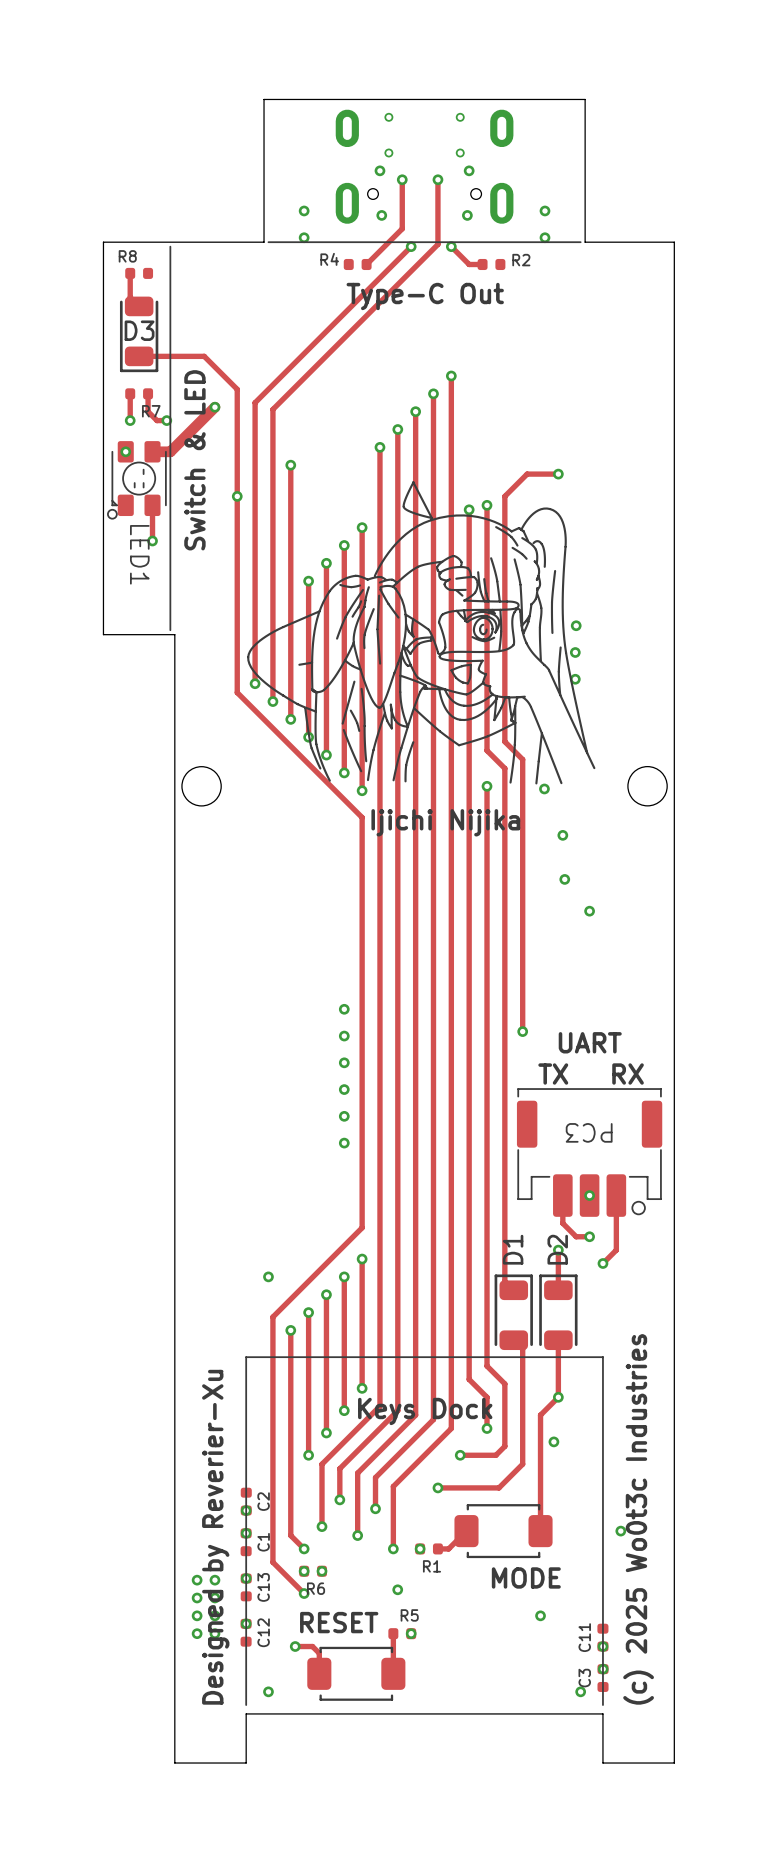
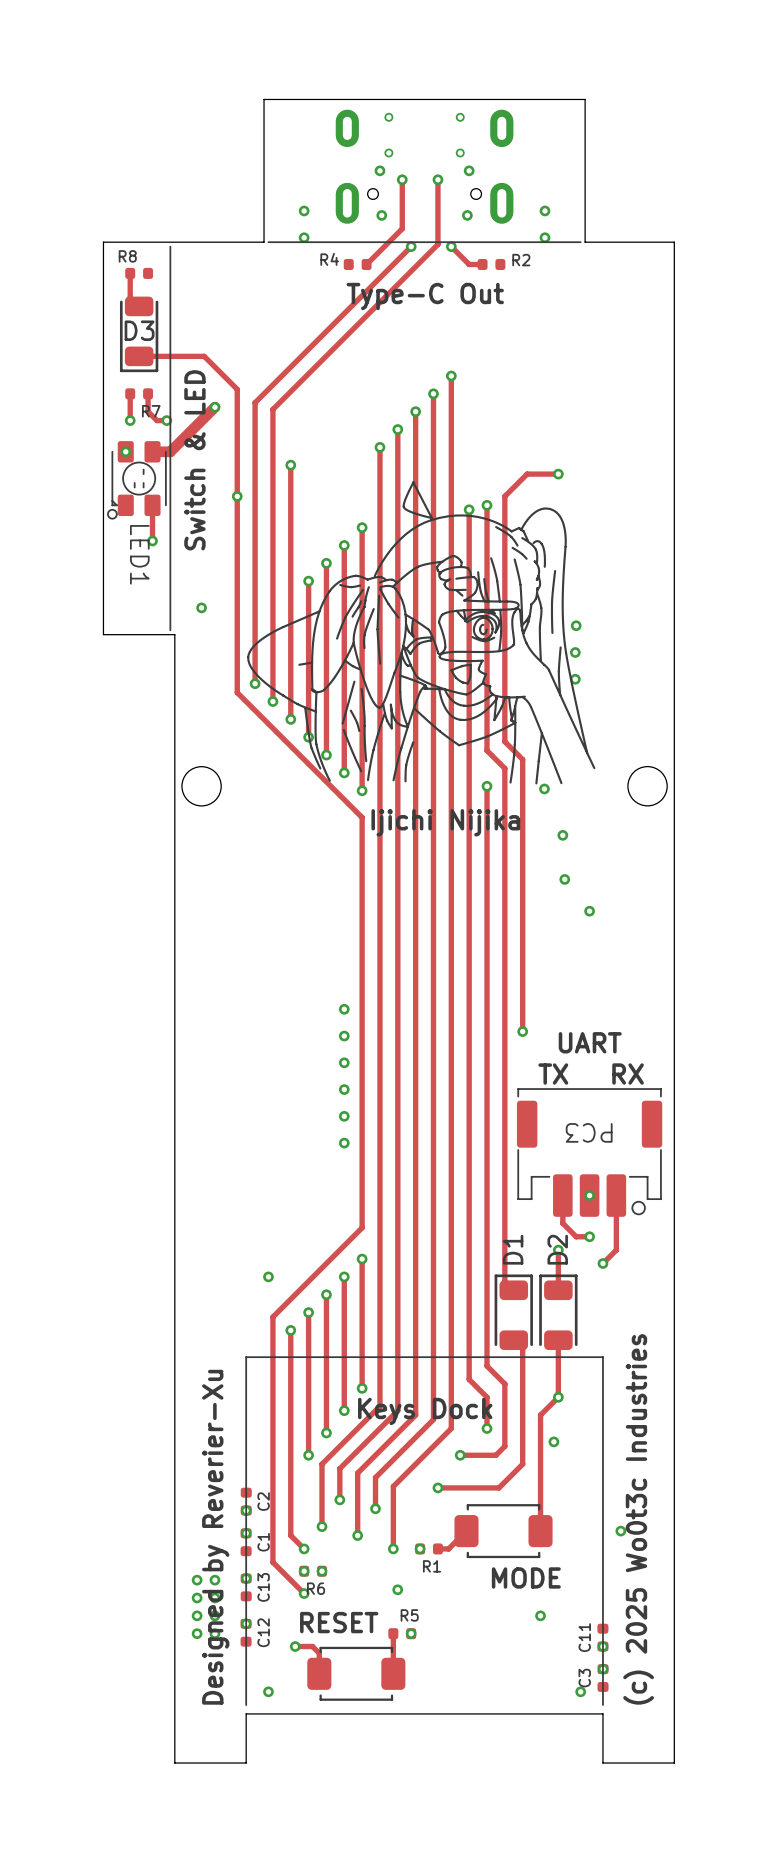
via: none -> (201, 607)

